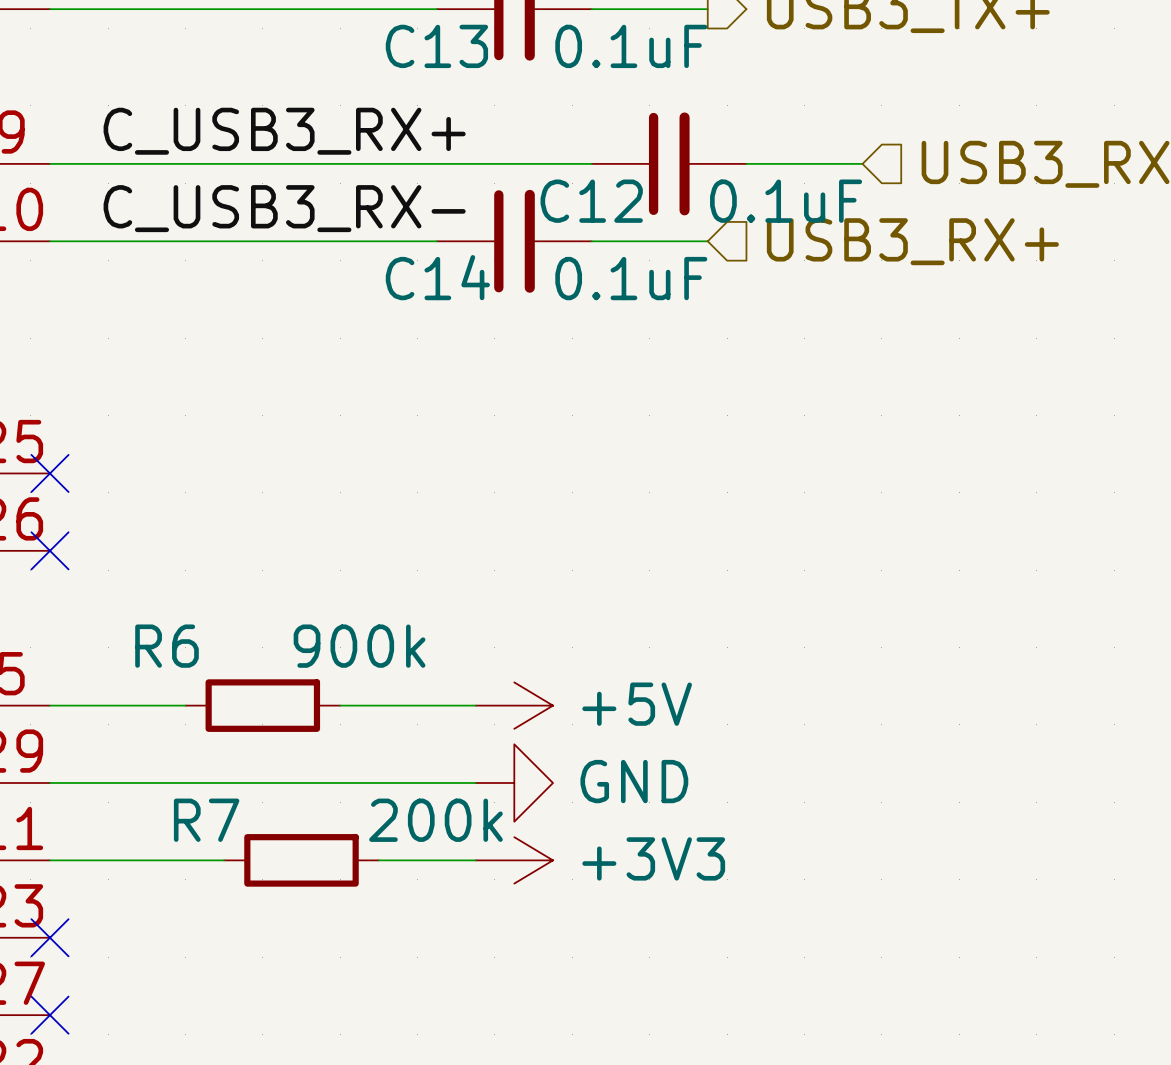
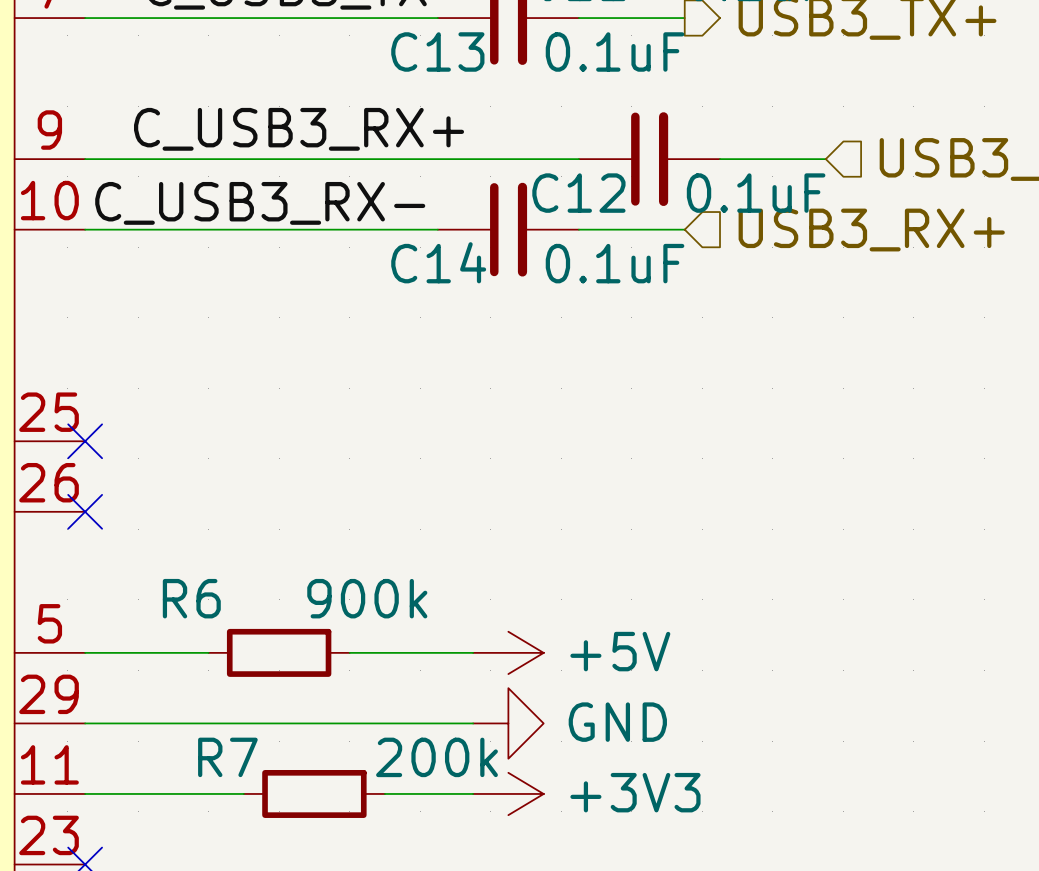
label position: C_USB3_RX- (284, 208) -> C_USB3_RX- (260, 203)

